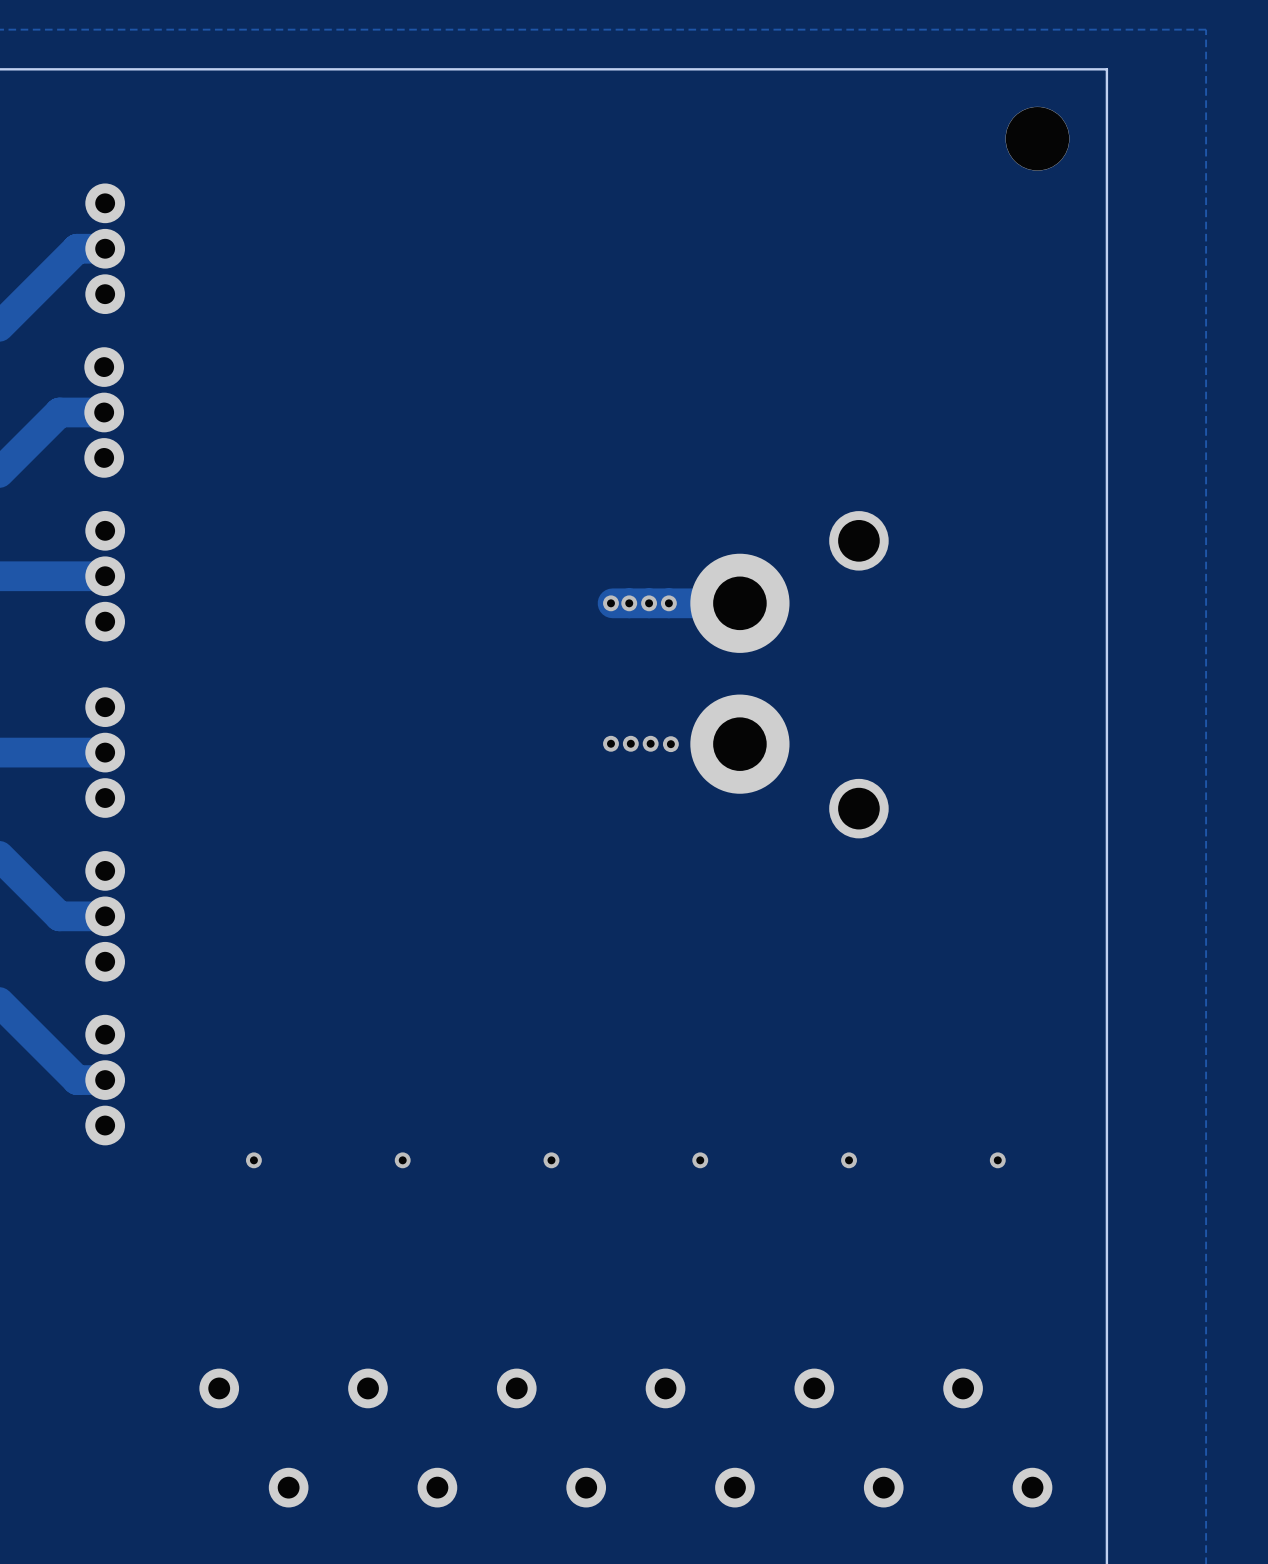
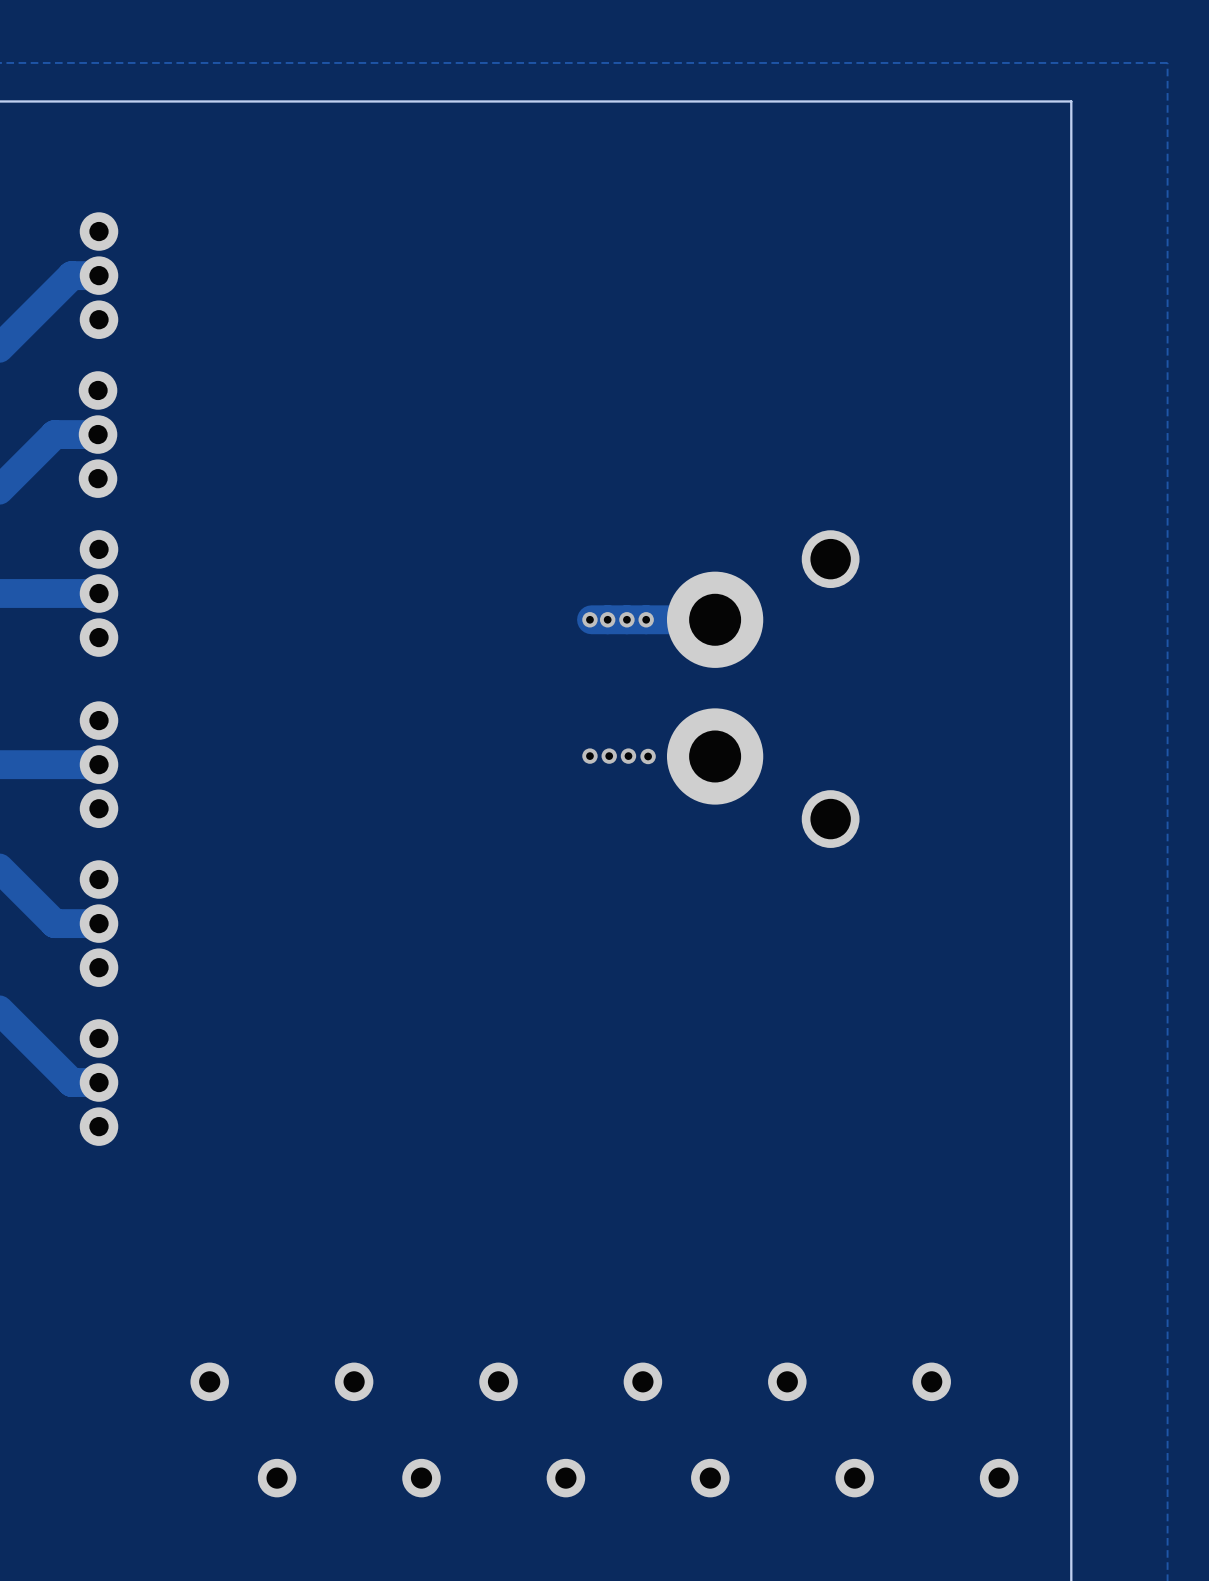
part: (1037, 138) -> none
via: (253, 1160) -> none
via: (402, 1160) -> none
via: (551, 1160) -> none
via: (700, 1160) -> none
via: (849, 1160) -> none
via: (997, 1160) -> none

